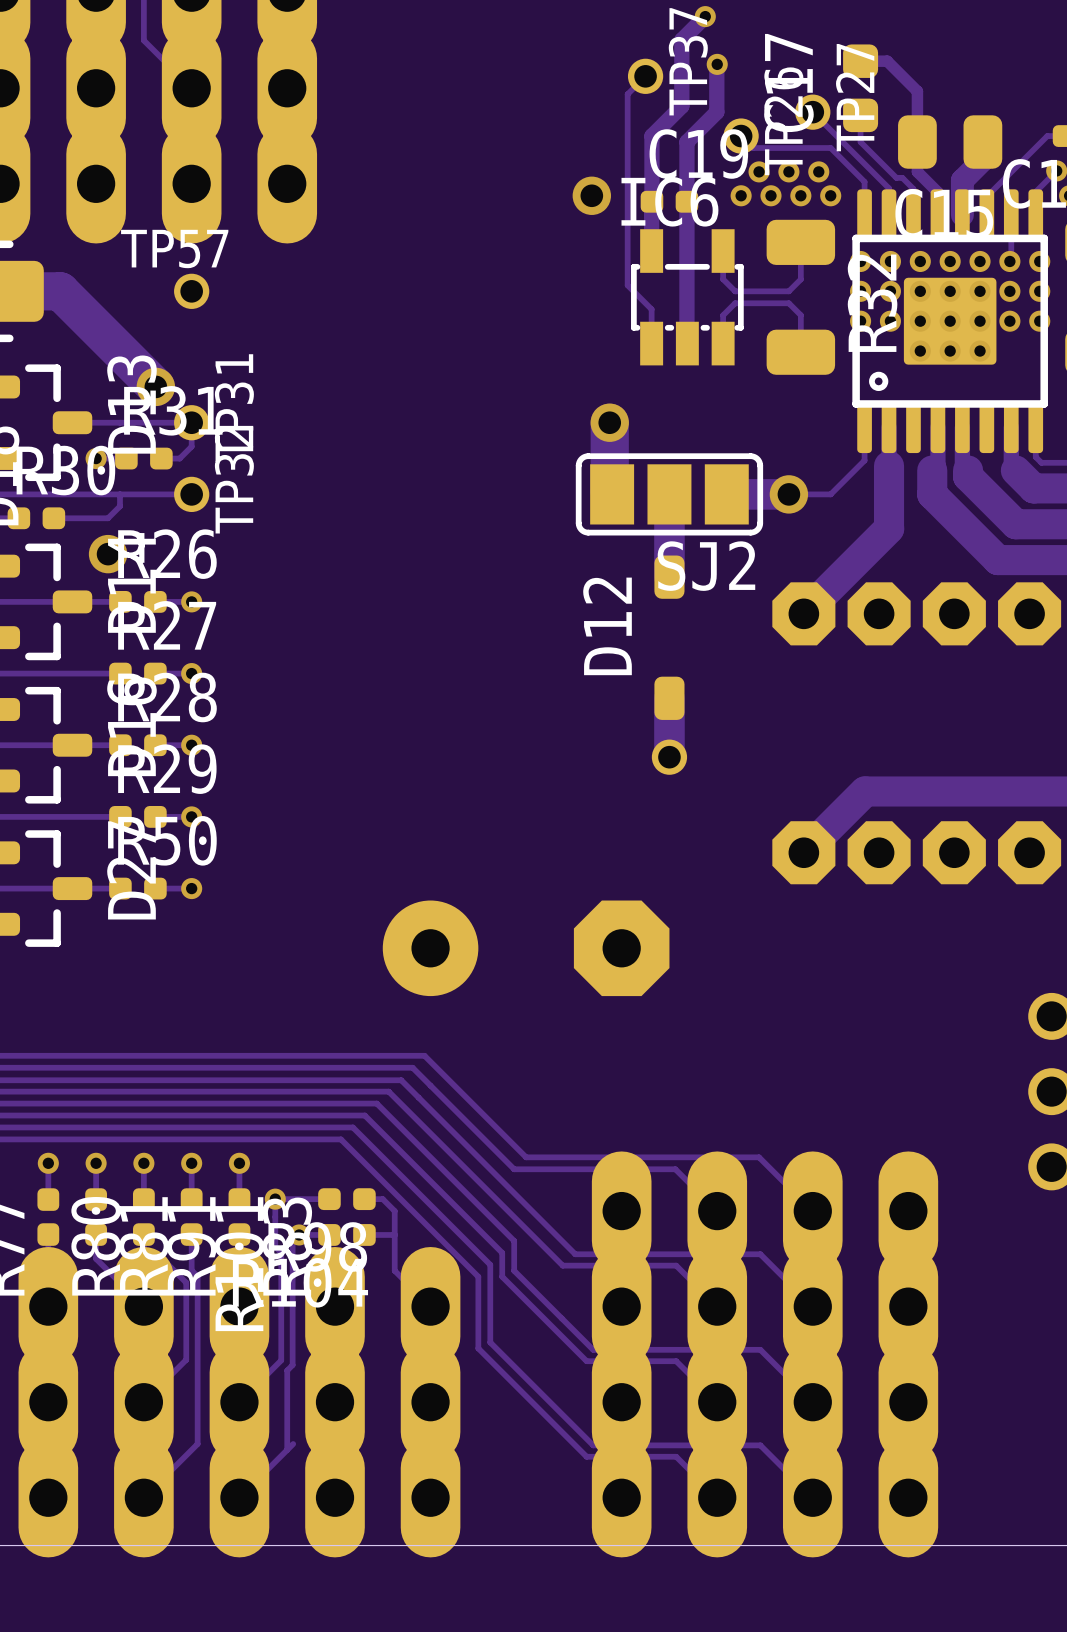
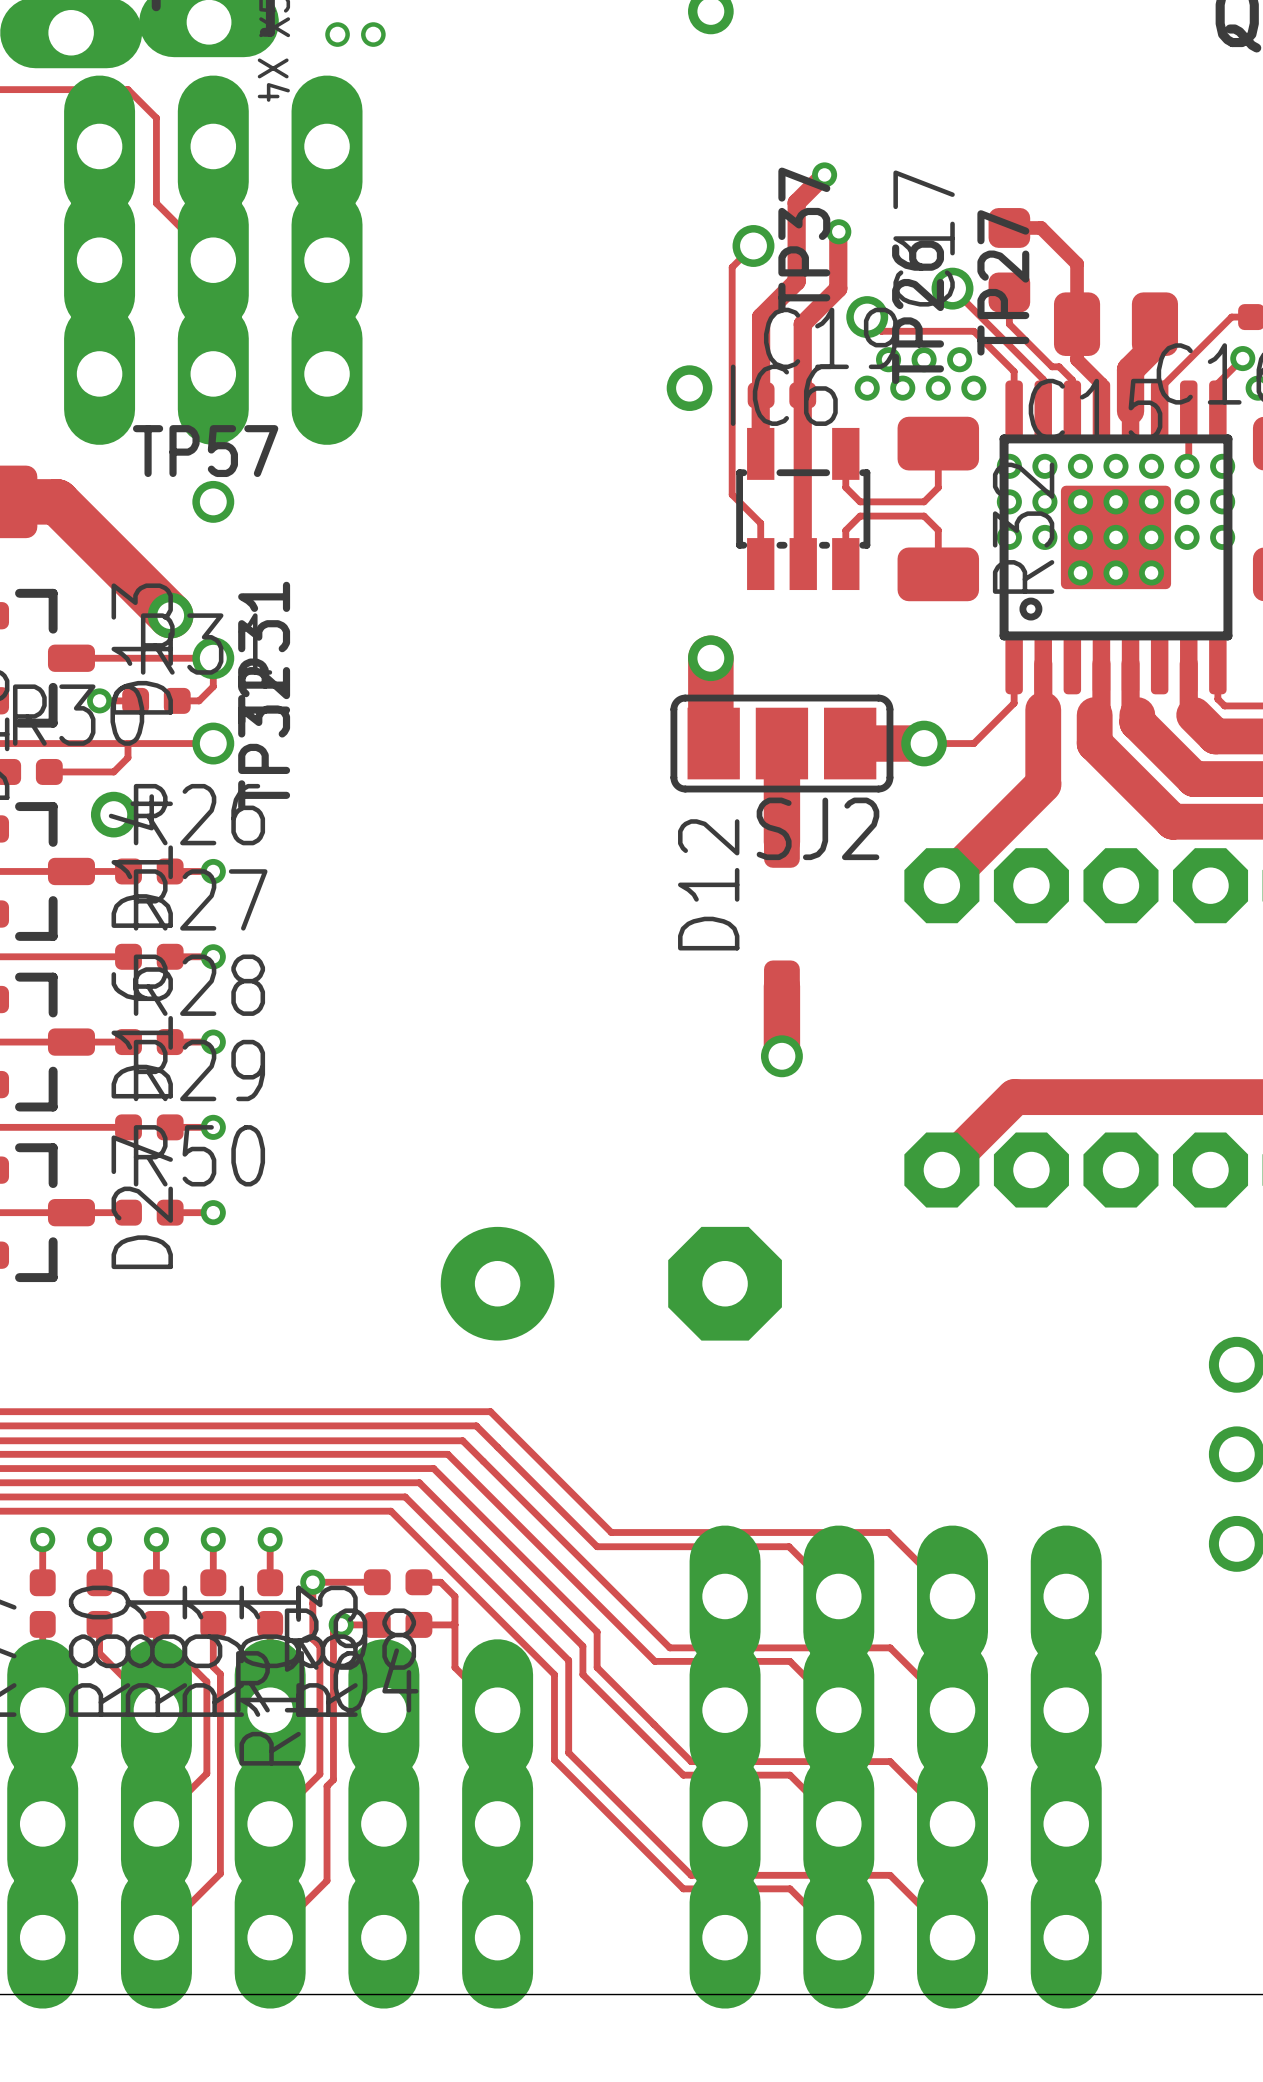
track: (293, 1444) (287, 1449) -> none

